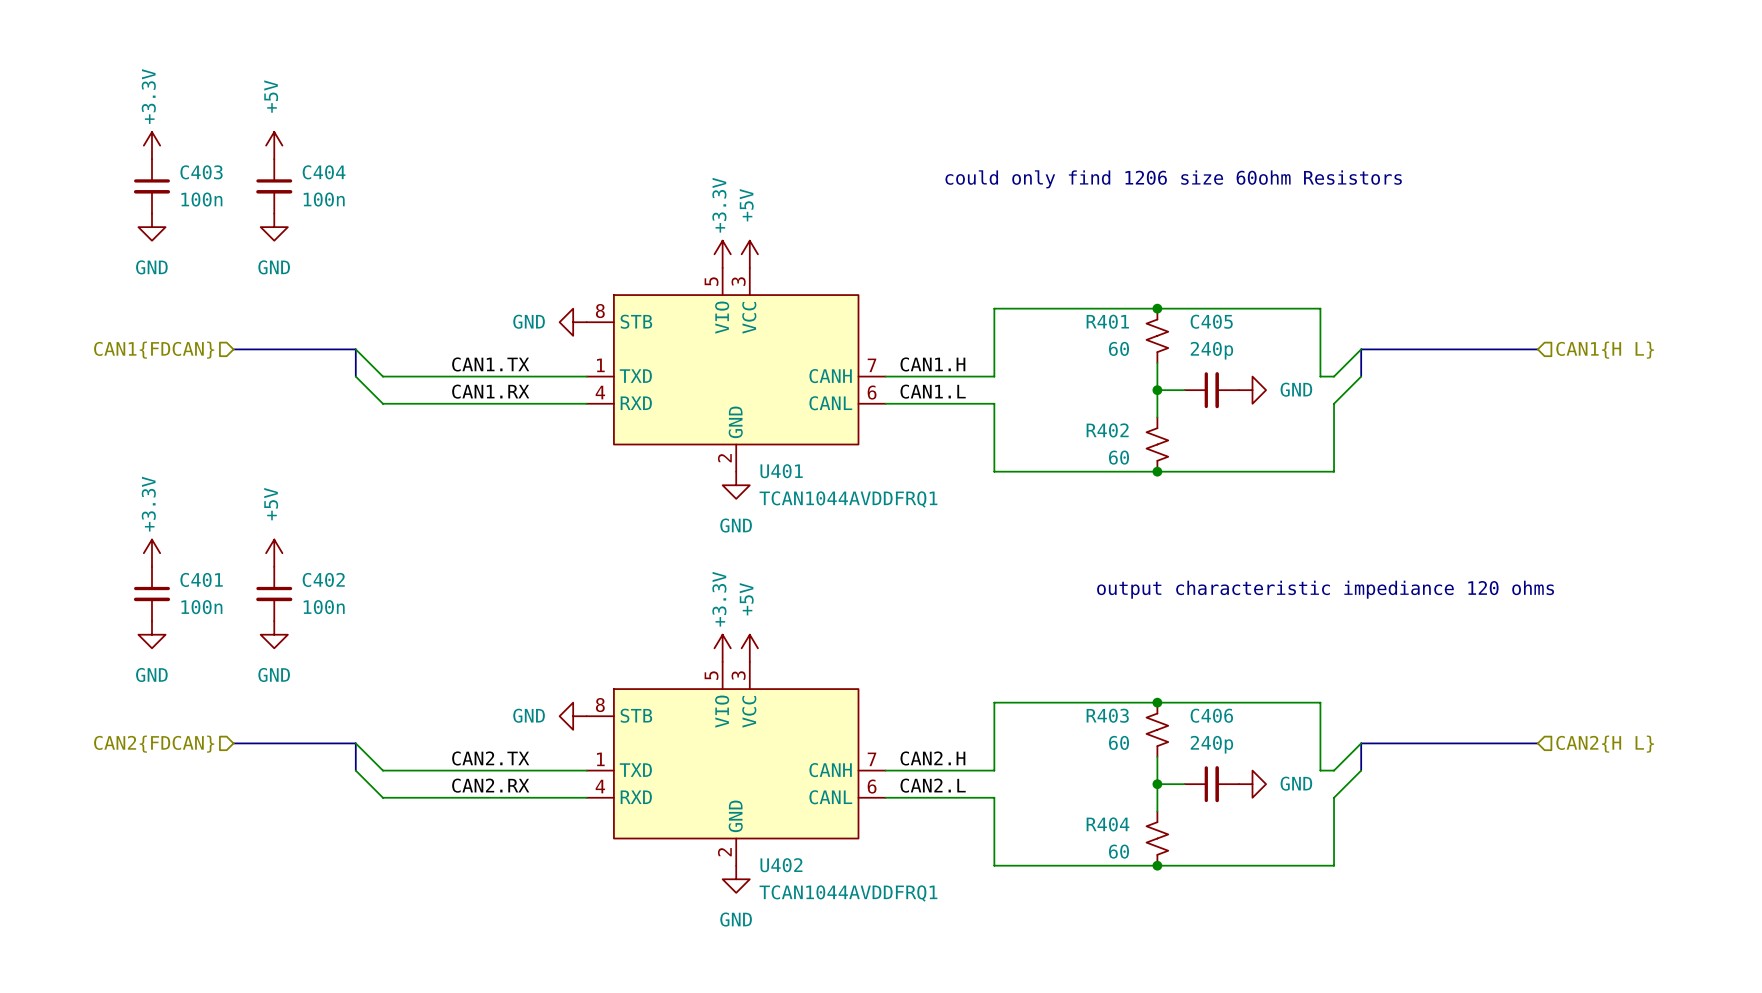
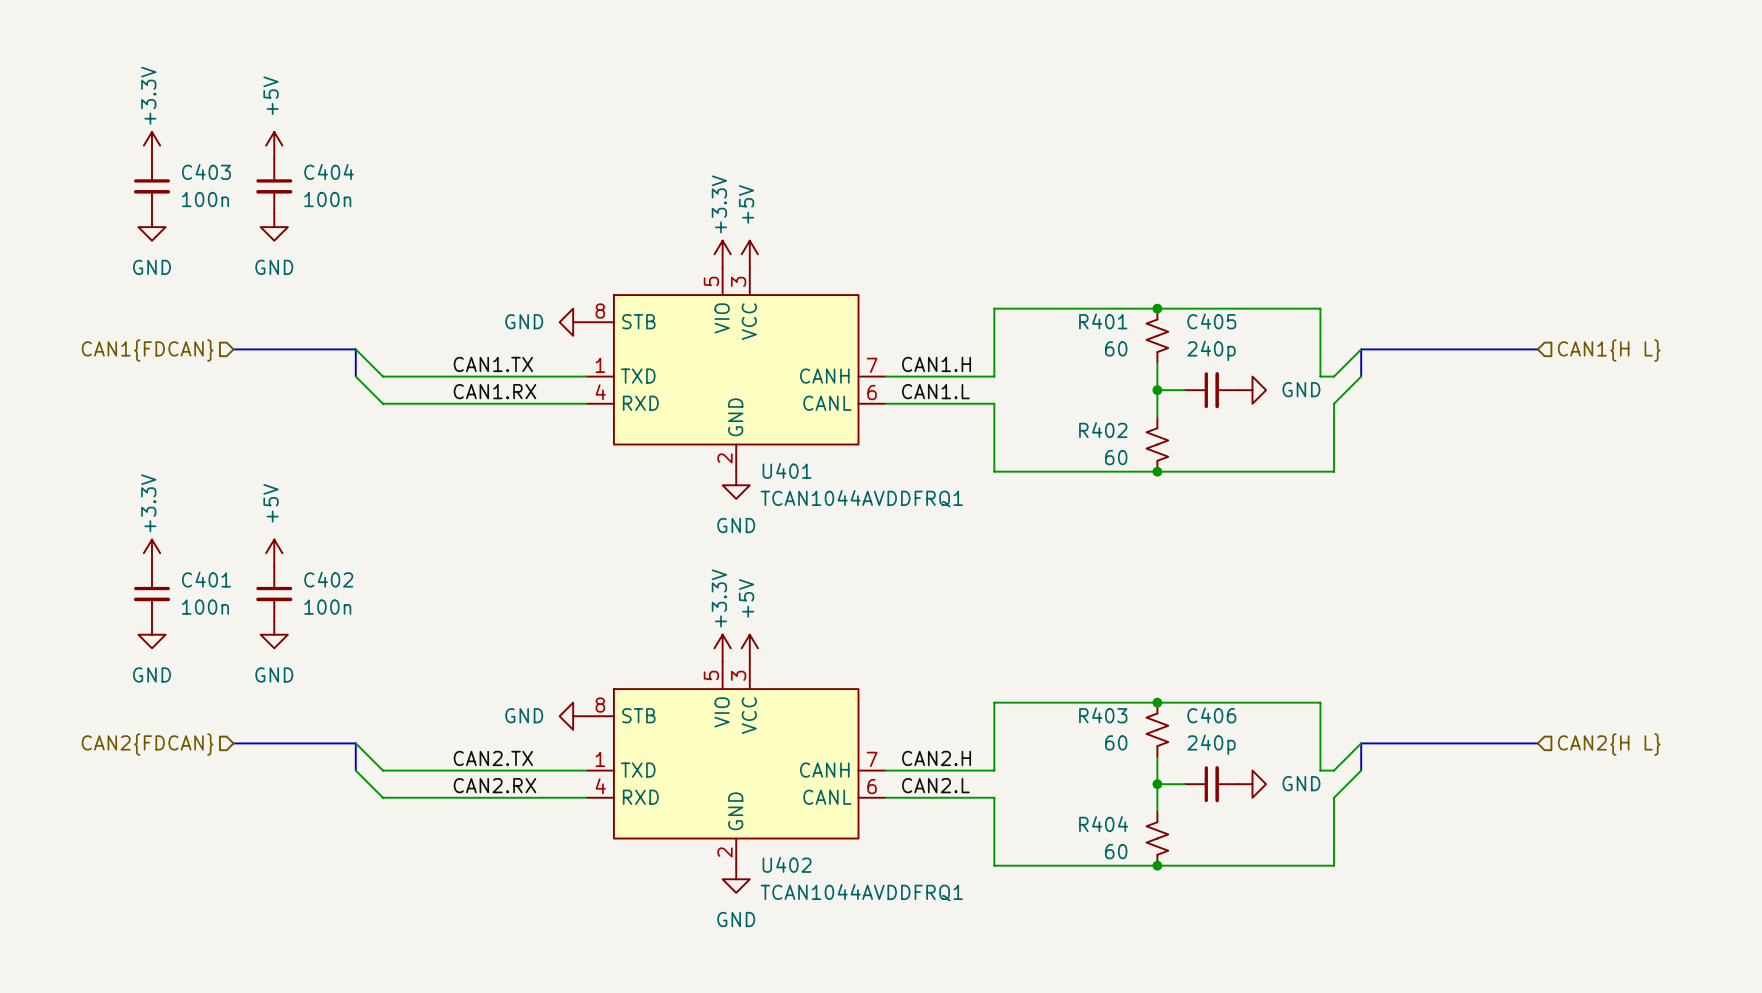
text: could only find 1206 size 60ohm Resistors (1173, 179) -> none
text: output characteristic impediance 120 ohms (1325, 589) -> none

